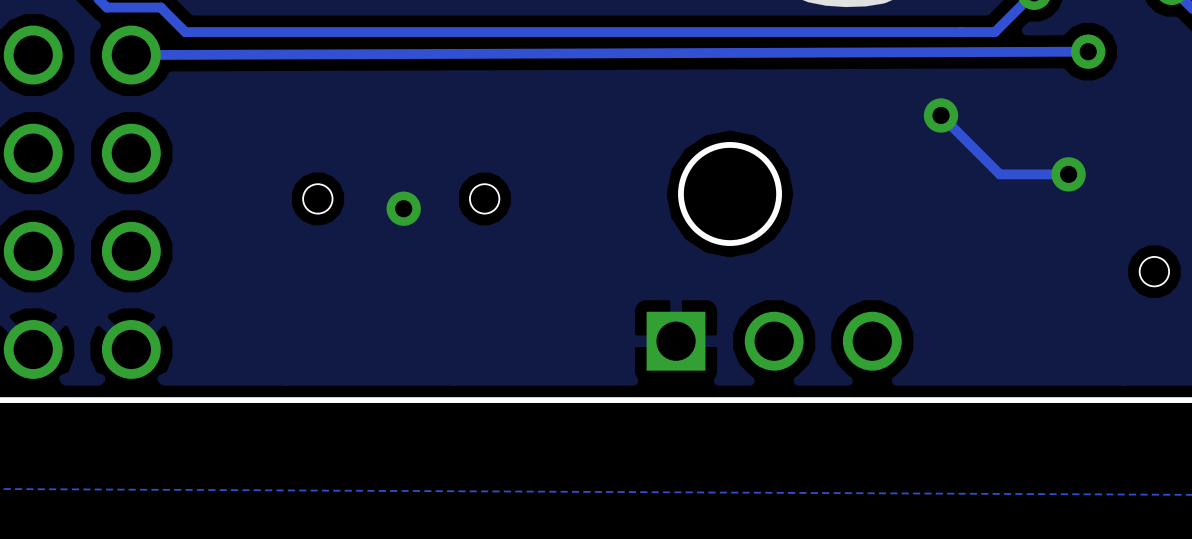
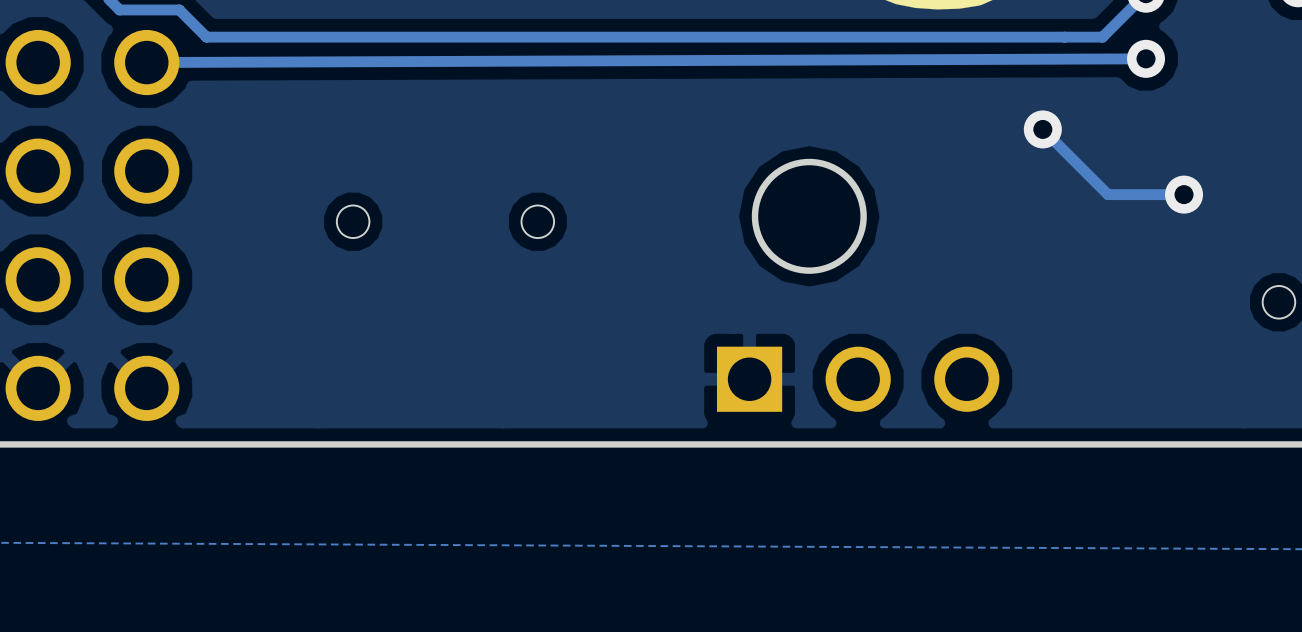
track: (1088, 51) (131, 55) -> (1146, 58) (146, 62)
via position: (1088, 51) -> (1146, 58)
via: (403, 208) -> none

